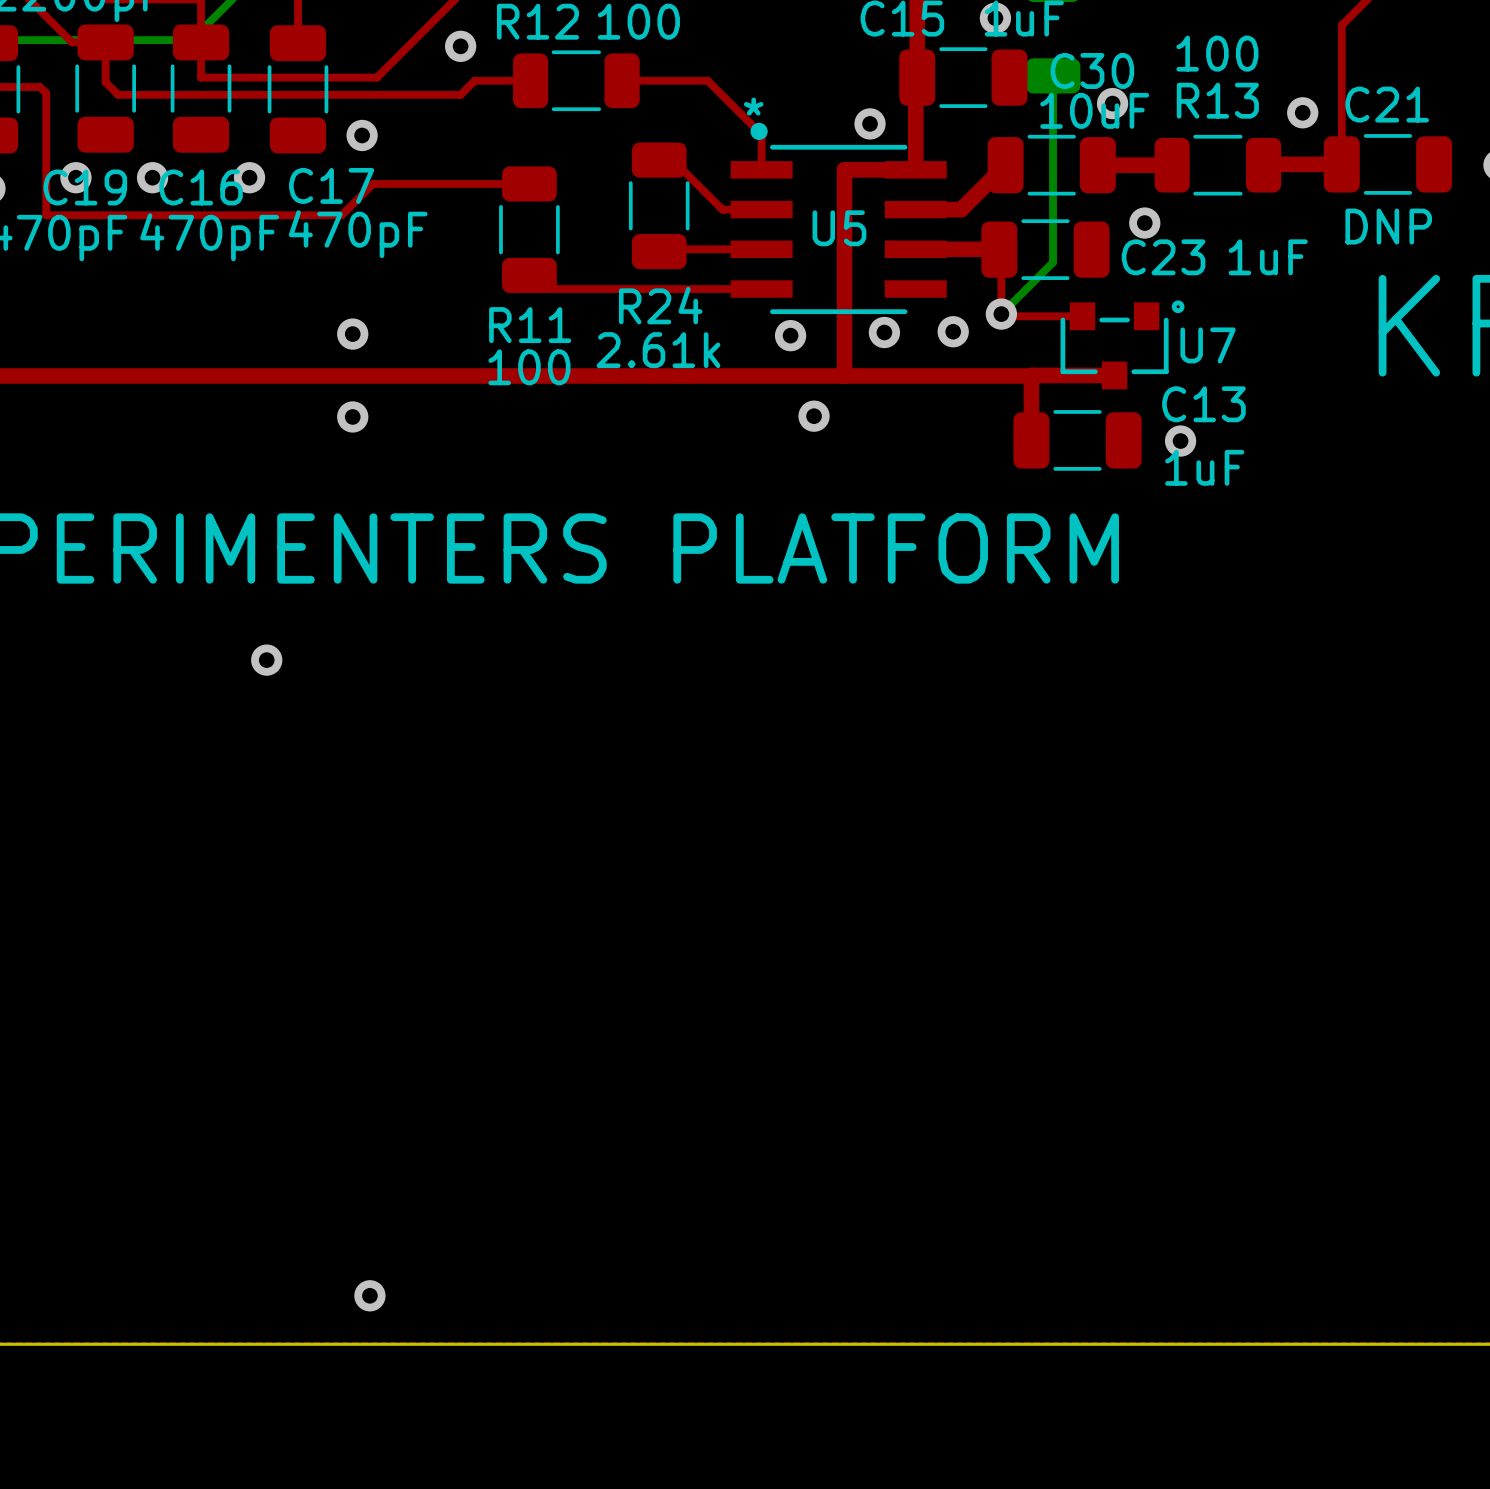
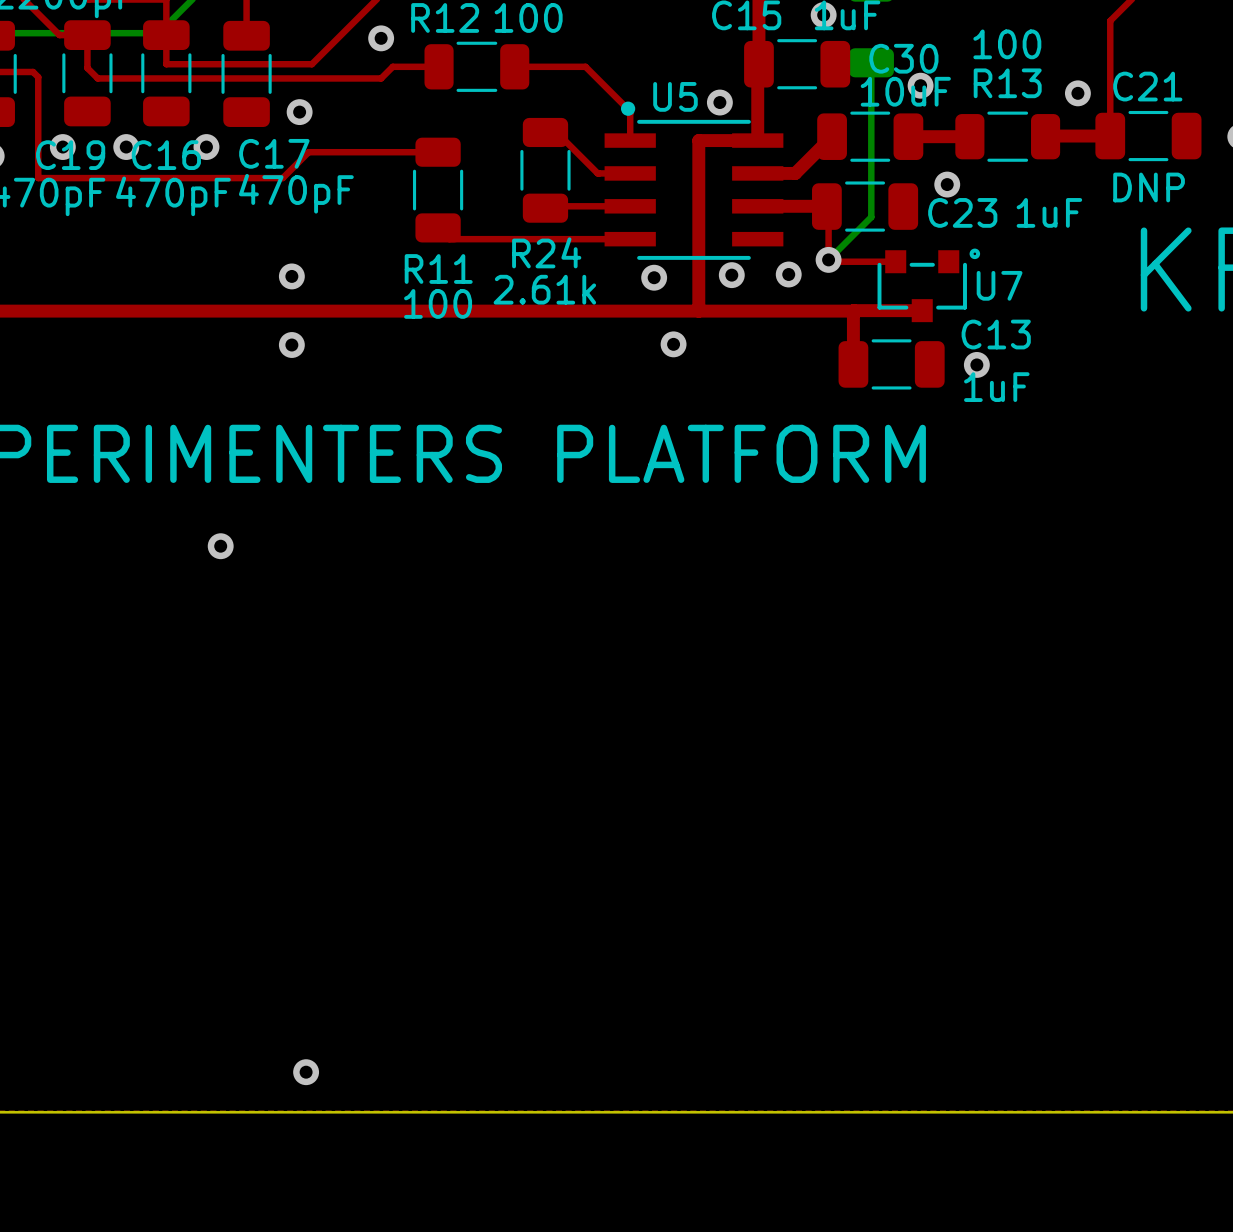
U5 text: * (753, 106) -> none
U5 name position: U5 (839, 228) -> U5 (675, 96)

